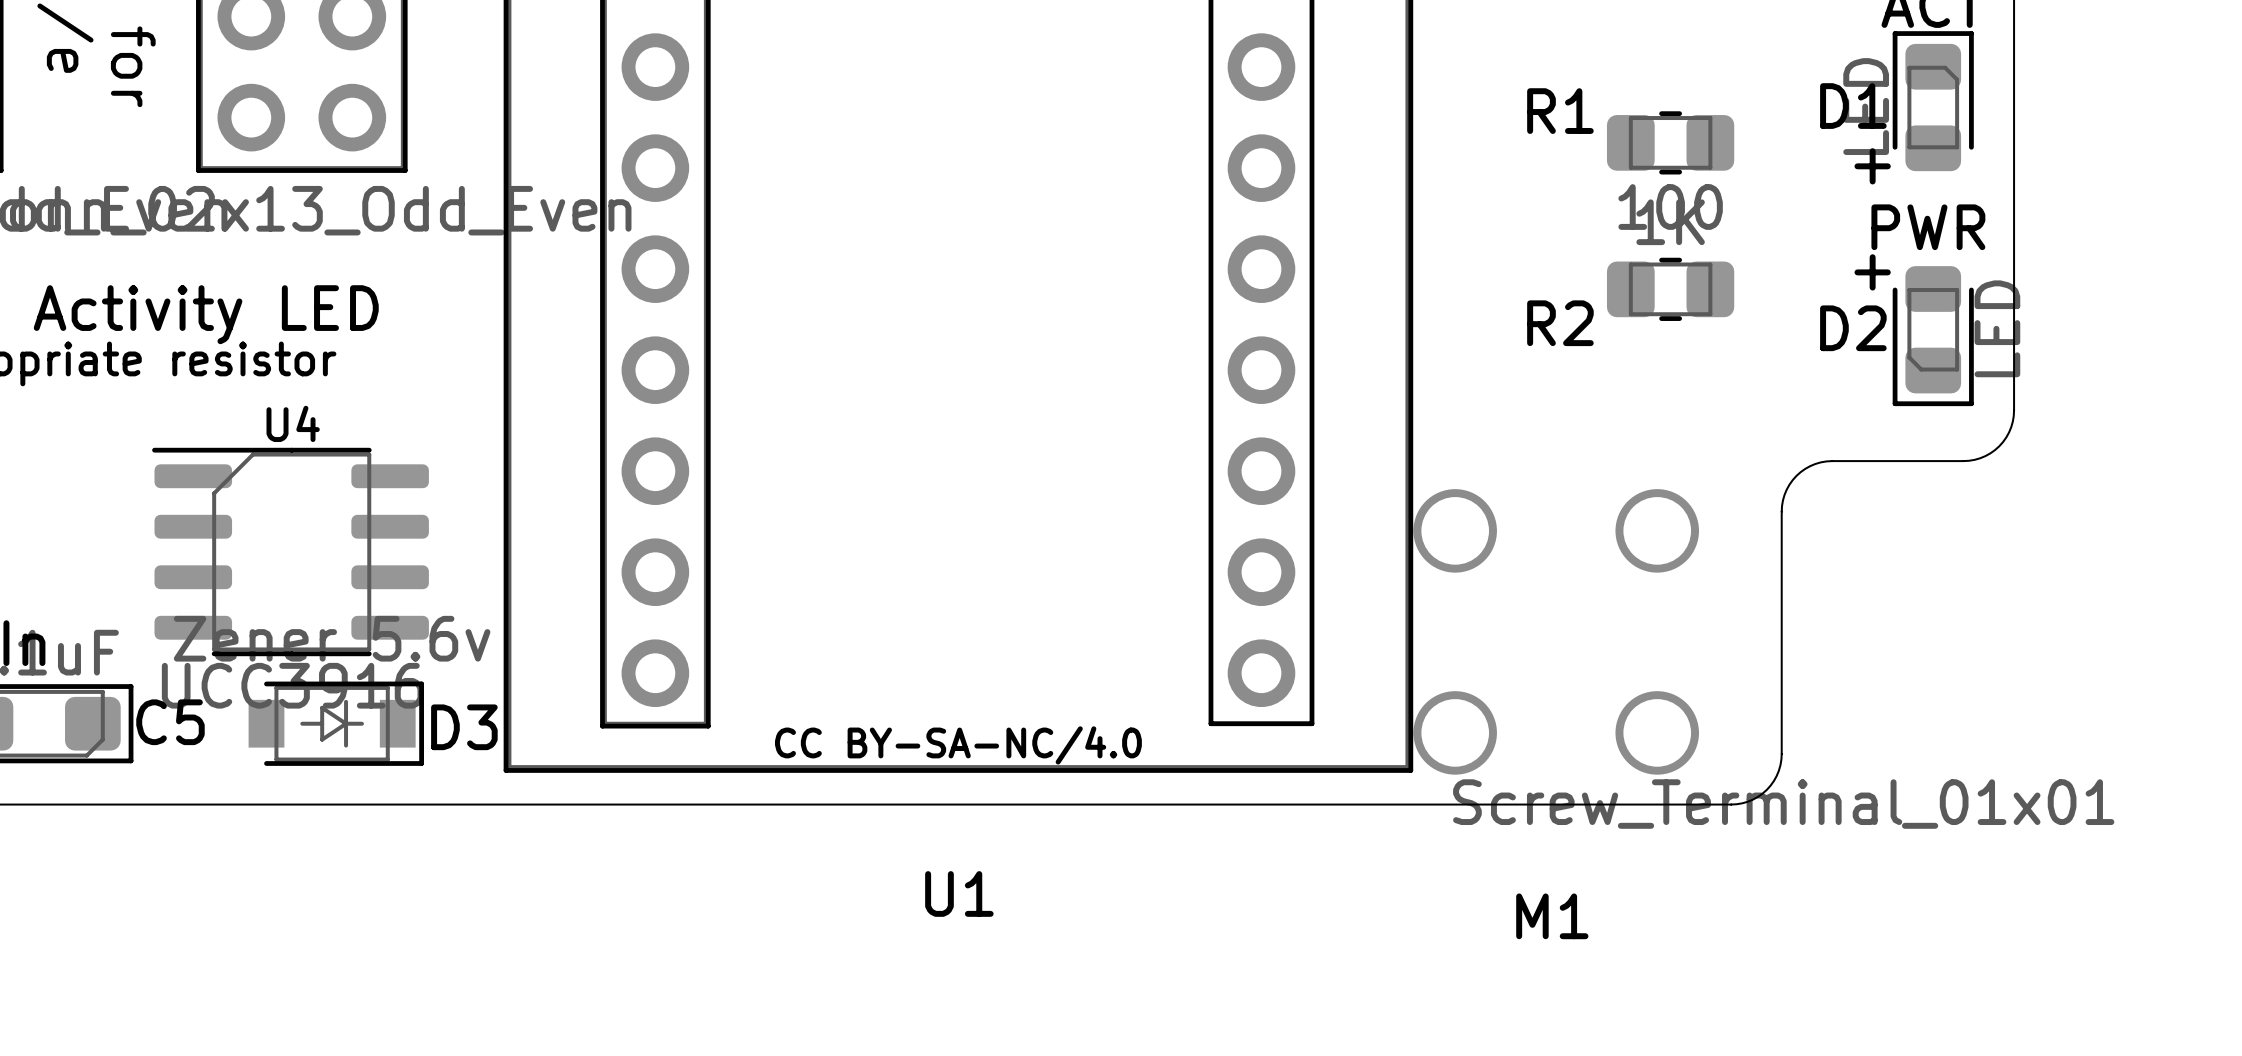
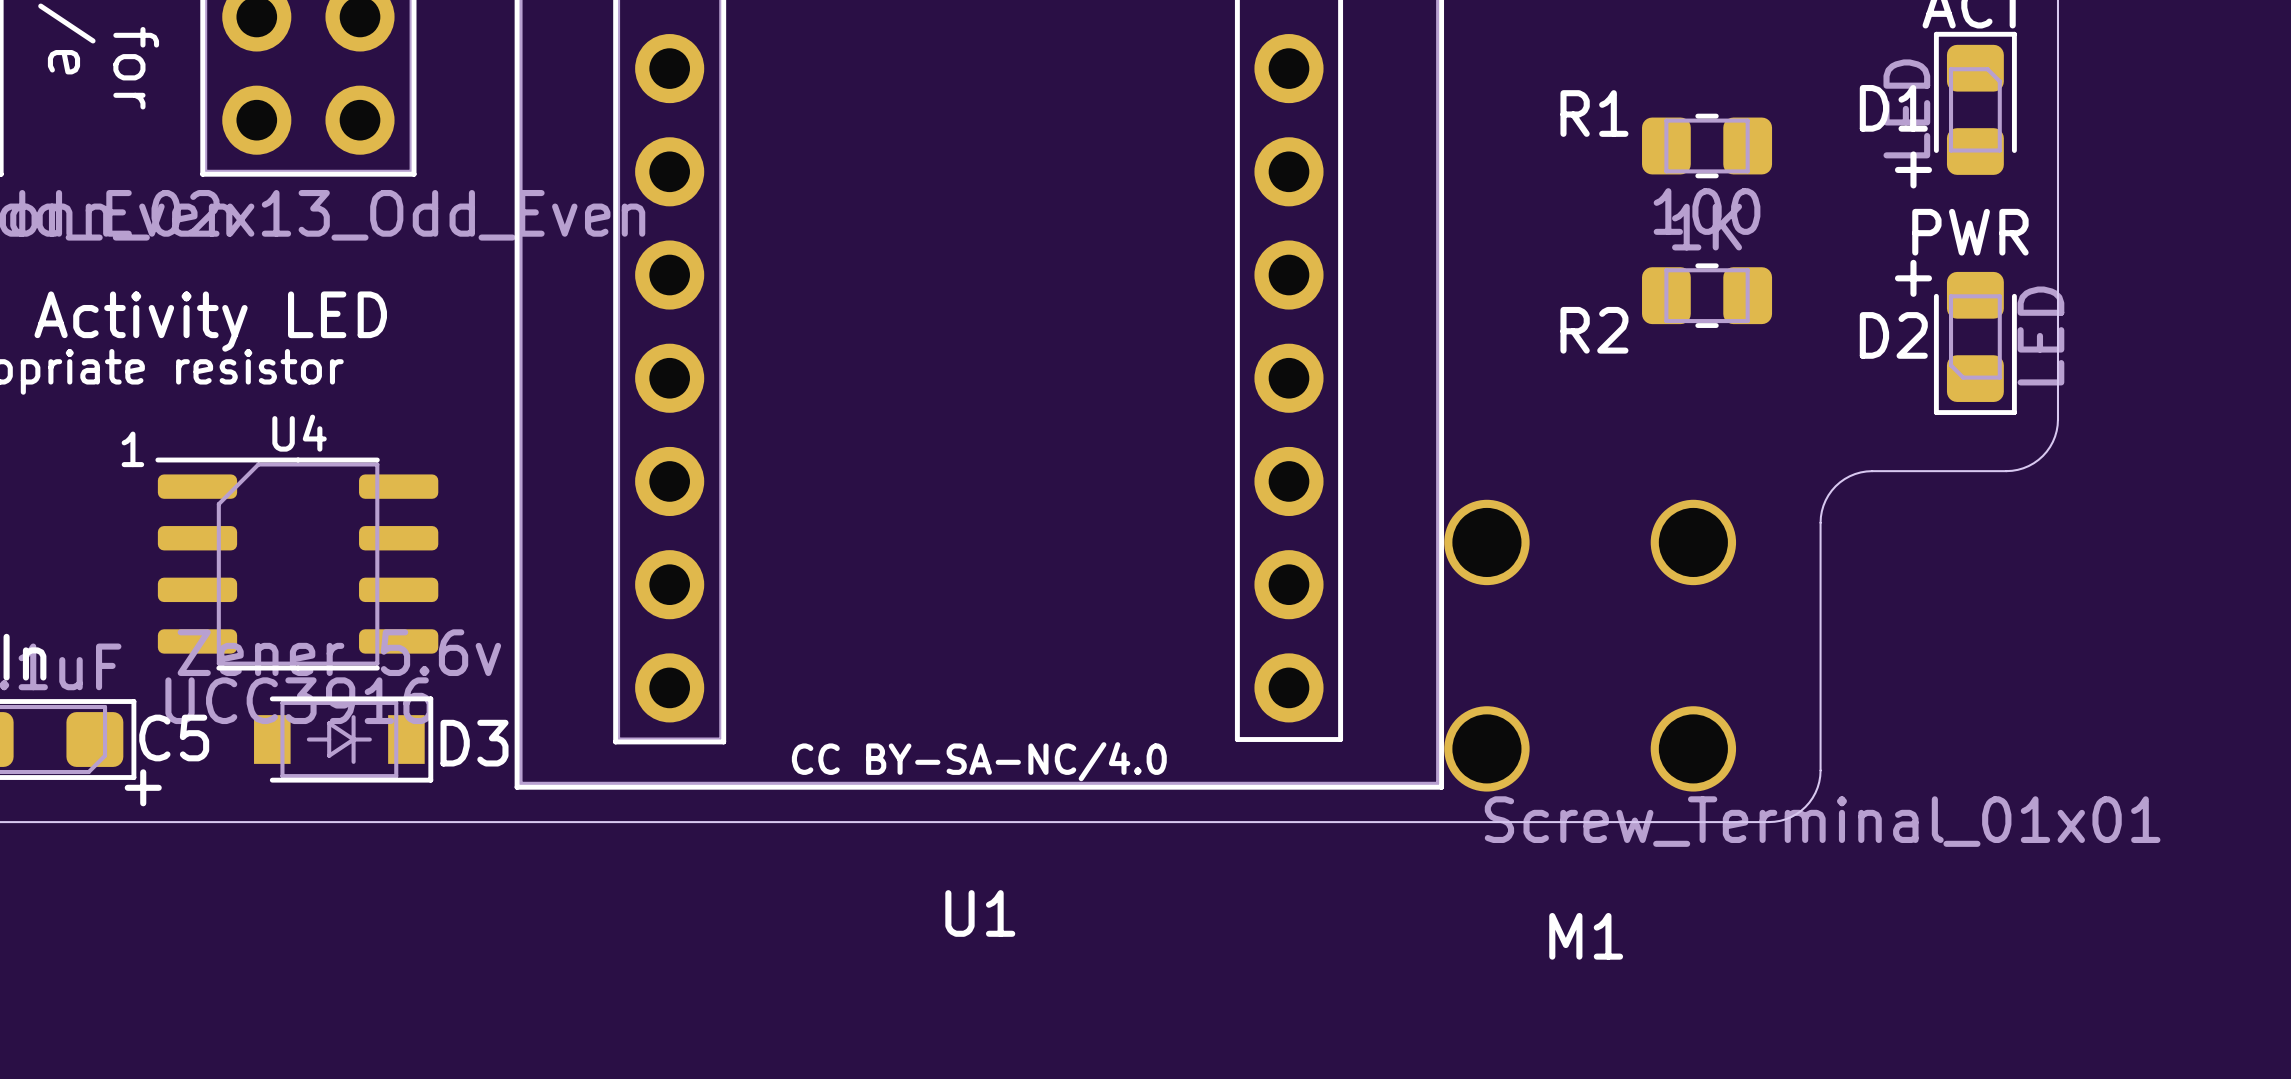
text: none -> 1 (132, 449)
text: none -> + (143, 787)

